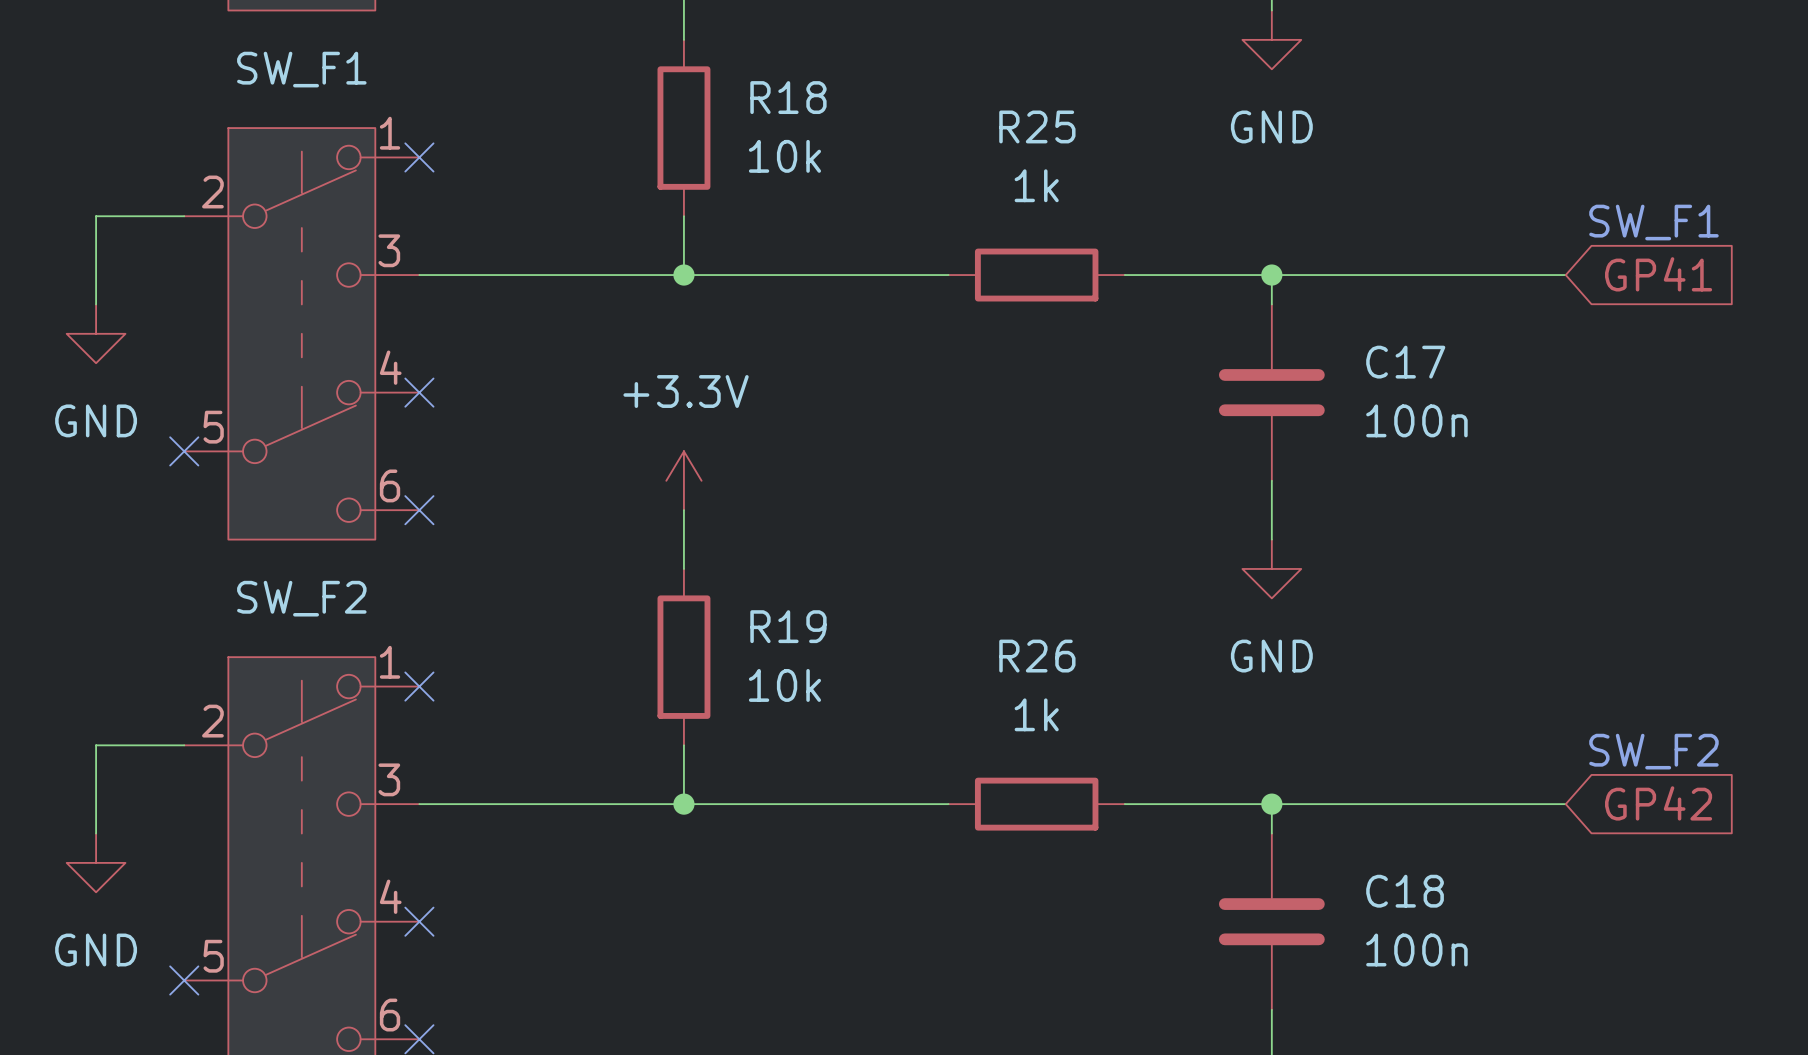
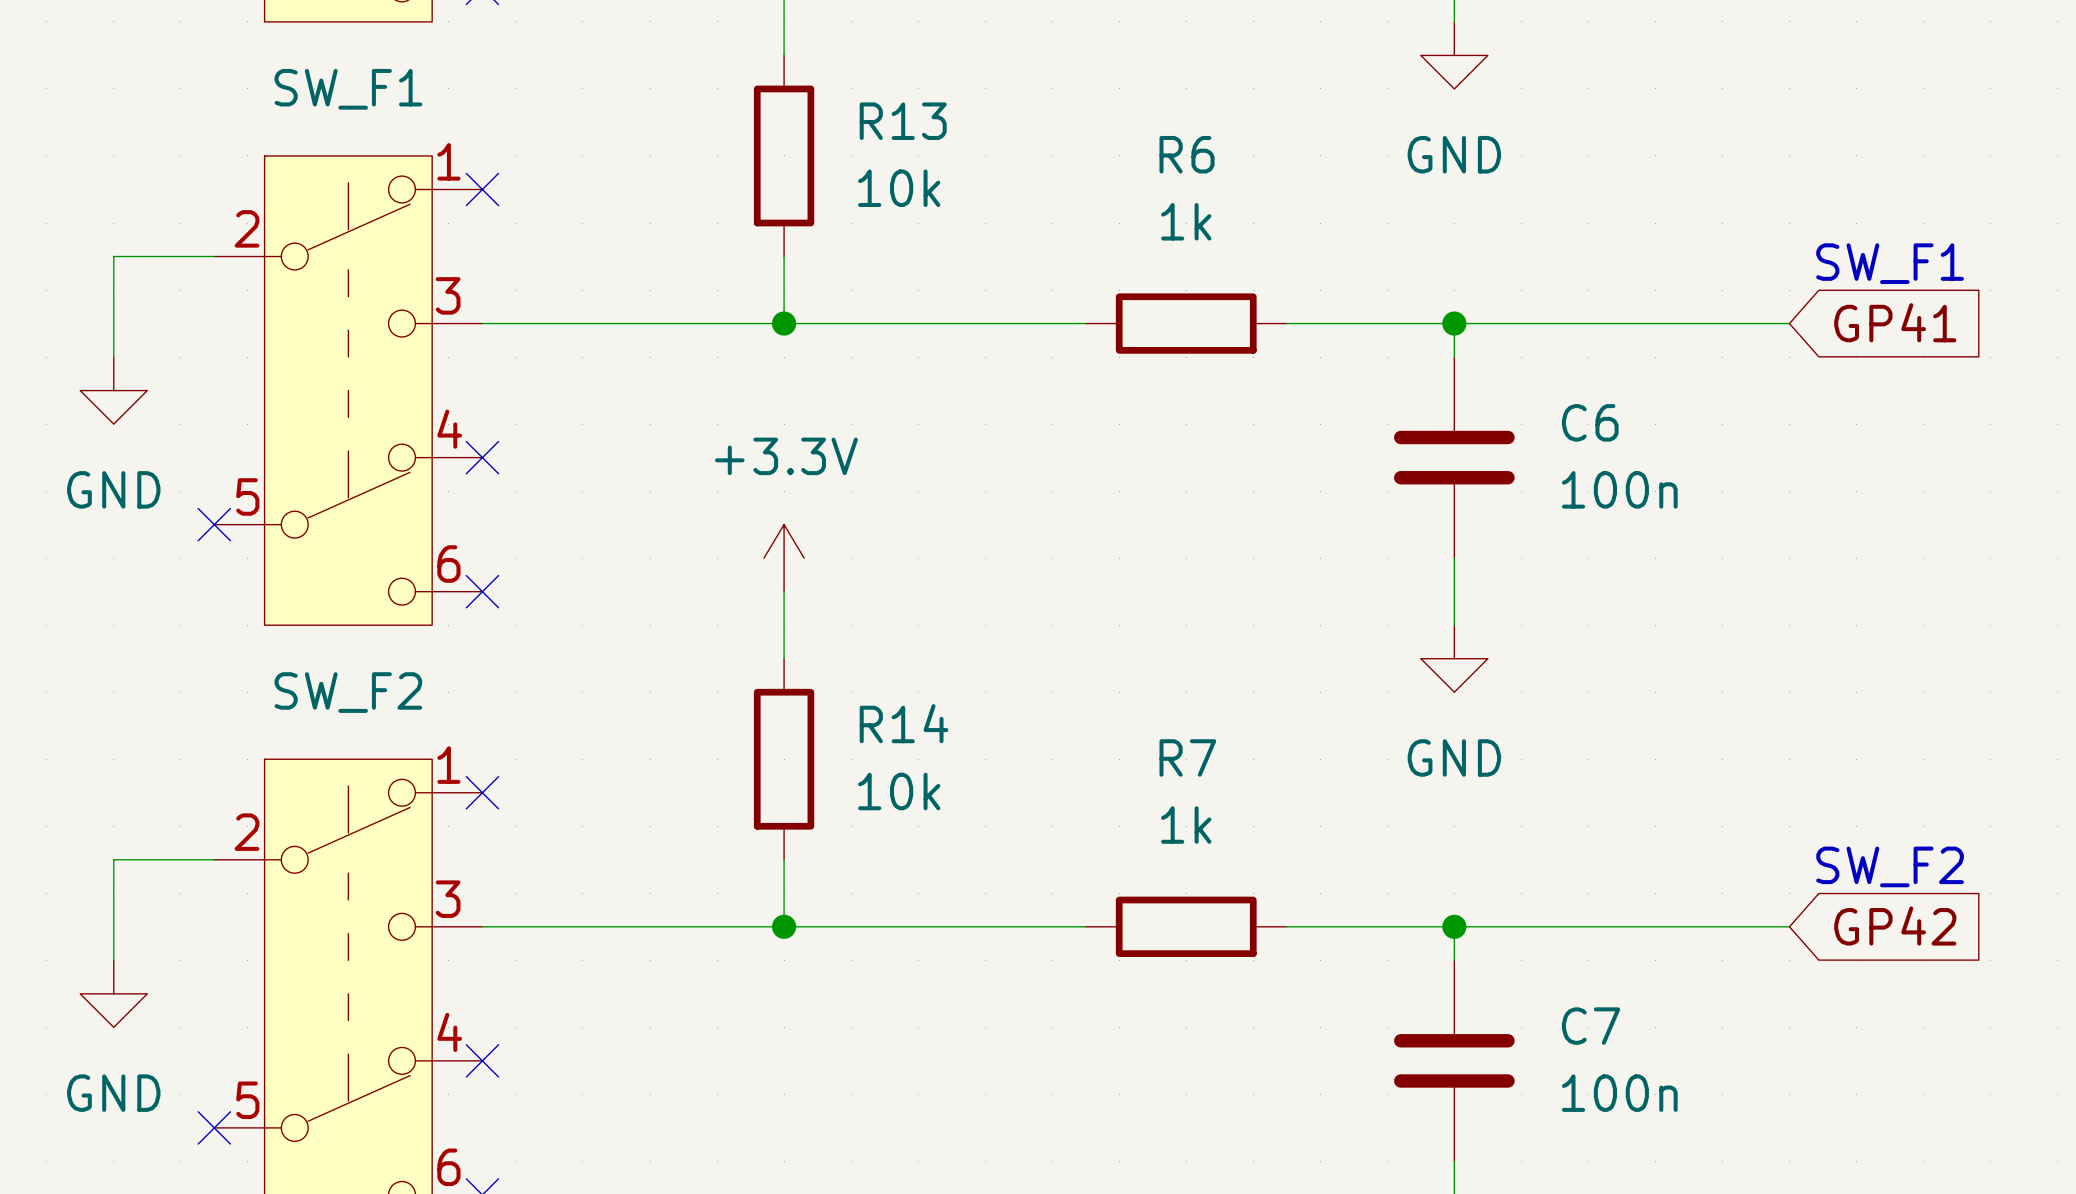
R18 name: R18 (788, 97) -> R13 (903, 121)
R25 name: R25 (1037, 126) -> R6 (1187, 154)
C17 name: C17 (1405, 362) -> C6 (1590, 422)
R19 name: R19 (788, 626) -> R14 (904, 723)
R26 name: R26 (1037, 656) -> R7 (1187, 757)
C18 name: C18 (1405, 891) -> C7 (1591, 1026)

